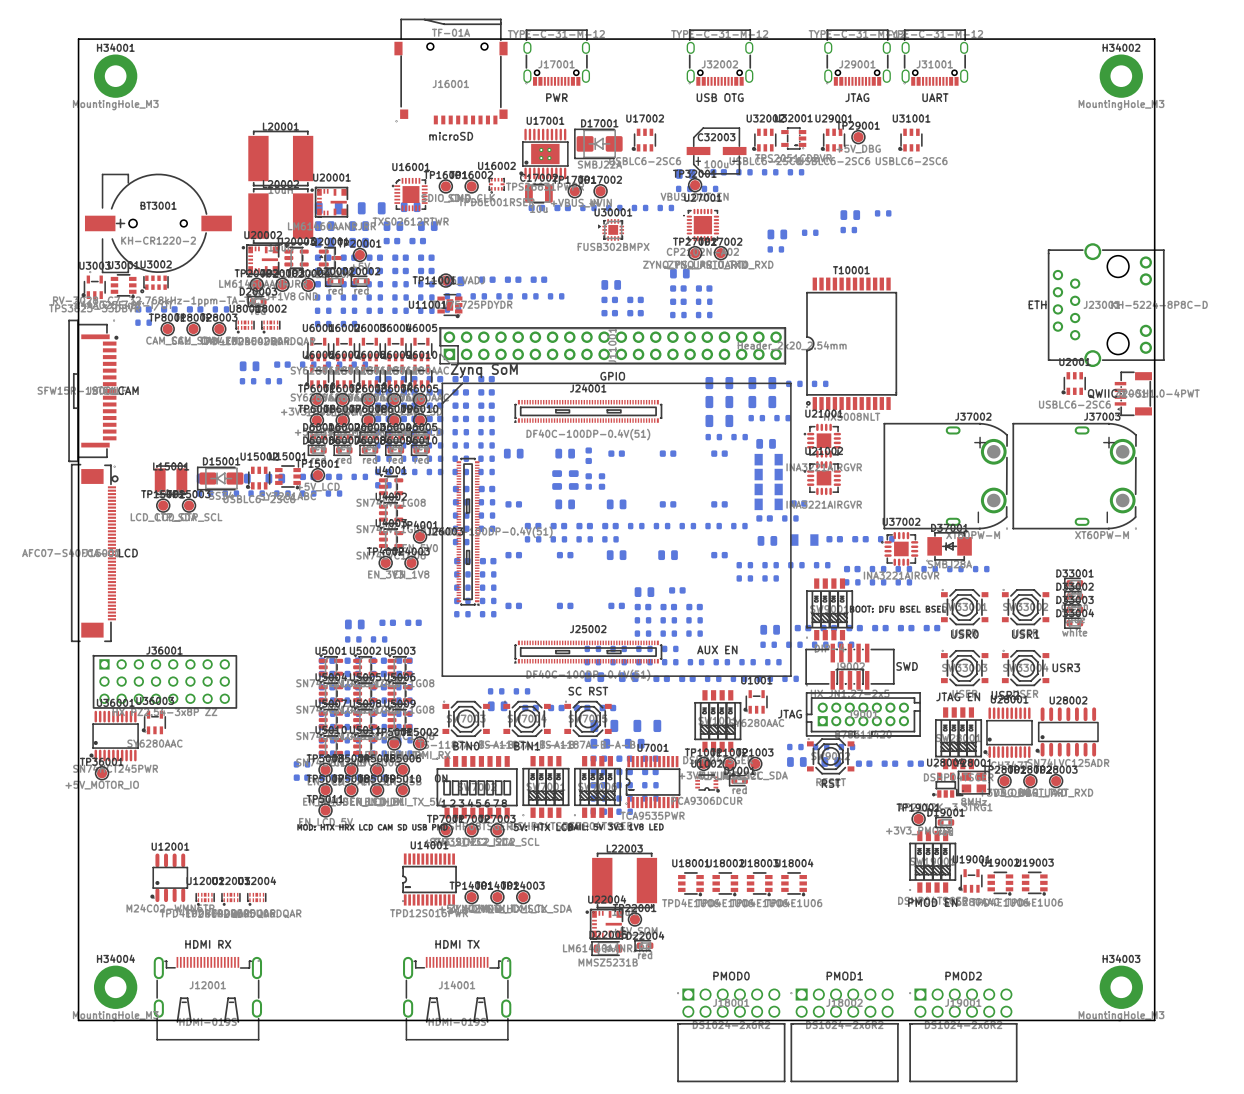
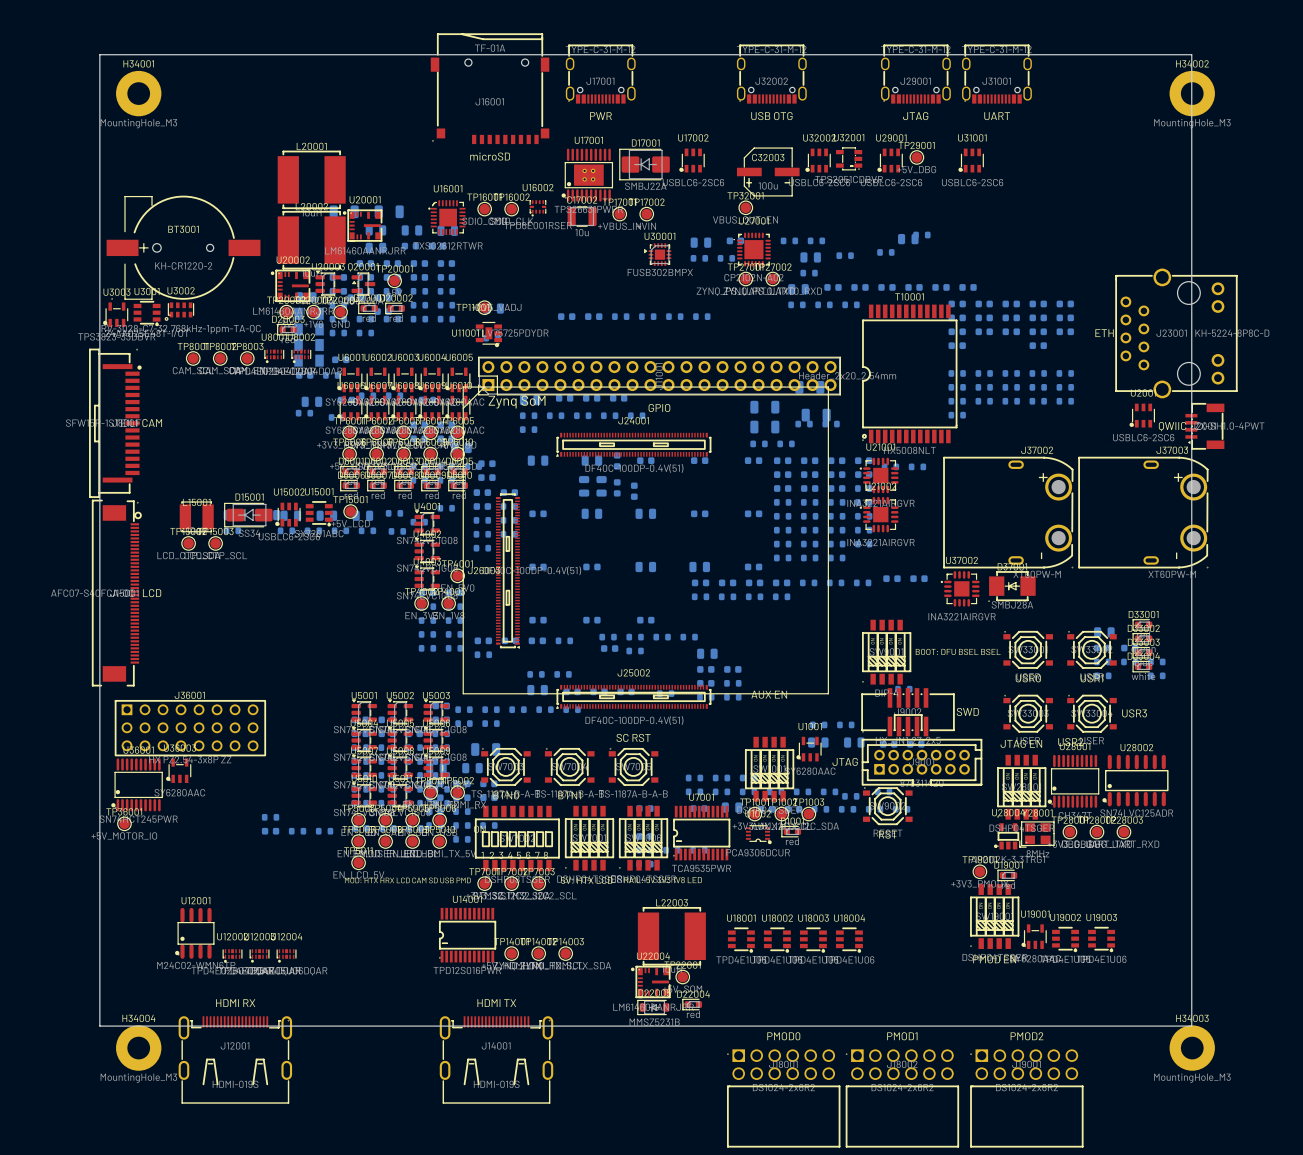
board edge: (1120, 39) (1154, 39) (1154, 1020) (78, 1020) (78, 966) -> (1191, 54) (1191, 1026) (99, 1026)
part: (718, 172) -> none
part: (744, 172) -> none
part: (770, 172) -> none
part: (795, 172) -> none
part: (685, 173) -> none
part: none -> (344, 211)
part: none -> (389, 211)
part: (684, 188) -> none
part: (710, 188) -> none
part footprint: [357, 202, 386, 215] -> [401, 225, 423, 236]
part: none -> (375, 230)
part: (536, 207) -> none
part: (562, 207) -> none
part: (588, 207) -> none
part: (614, 207) -> none
part: (640, 207) -> none
part: (665, 207) -> none
part: (328, 208) -> none
part: none -> (921, 235)
part: (883, 213) -> none
part: none -> (735, 240)
part: none -> (789, 240)
part: none -> (816, 240)
part: none -> (700, 242)
part: none -> (410, 246)
part: none -> (437, 246)
part: none -> (375, 247)
part: (324, 226) -> none
part: (359, 226) -> none
part: (393, 226) -> none
part: (427, 226) -> none
part: none -> (885, 252)
part: none -> (845, 255)
part: (848, 230) -> none
part: (810, 232) -> none
part: none -> (699, 258)
part: none -> (726, 258)
part position: (777, 234) -> (810, 257)
part: none -> (365, 263)
part: none -> (392, 263)
part: none -> (419, 263)
part: none -> (446, 263)
part: (391, 241) -> none
part: (417, 241) -> none
part: (324, 242) -> none
part: (359, 242) -> none
part: none -> (809, 273)
part: (775, 249) -> none
part: none -> (338, 277)
part: none -> (365, 277)
part: none -> (392, 277)
part: none -> (419, 277)
part: none -> (446, 277)
part: (323, 257) -> none
part: (348, 257) -> none
part: (374, 257) -> none
part: (400, 257) -> none
part: (426, 257) -> none
part: none -> (832, 287)
part: none -> (859, 287)
part: none -> (887, 287)
part: none -> (914, 287)
part: none -> (941, 287)
part: none -> (968, 287)
part: none -> (798, 289)
part: none -> (338, 291)
part: none -> (365, 291)
part: none -> (392, 291)
part: none -> (419, 291)
part: none -> (446, 291)
part: none -> (306, 297)
part: (374, 270) -> none
part: (400, 270) -> none
part: (426, 270) -> none
part: (679, 273) -> none
part: none -> (796, 304)
part: none -> (823, 304)
part: none -> (850, 304)
part: none -> (957, 303)
part: none -> (984, 303)
part: none -> (1011, 303)
part: none -> (1038, 303)
part: none -> (1065, 303)
part: none -> (338, 305)
part: none -> (419, 305)
part: none -> (446, 305)
part: (487, 279) -> none
part: (513, 279) -> none
part: (538, 279) -> none
part: (323, 284) -> none
part: (374, 284) -> none
part: (400, 284) -> none
part: (426, 284) -> none
part: (611, 284) -> none
part: none -> (309, 313)
part: (678, 288) -> none
part: (704, 288) -> none
part: none -> (566, 316)
part: none -> (593, 316)
part: none -> (647, 316)
part: none -> (674, 316)
part: none -> (701, 316)
part: none -> (957, 317)
part: none -> (984, 317)
part: none -> (1011, 317)
part: none -> (1038, 317)
part: none -> (1065, 317)
part: none -> (338, 319)
part: none -> (365, 319)
part: none -> (392, 319)
part: none -> (419, 319)
part: none -> (446, 319)
part: (452, 296) -> none
part: (478, 296) -> none
part: (504, 296) -> none
part: (530, 296) -> none
part position: (556, 296) -> (620, 316)
part: (323, 297) -> none
part: (348, 297) -> none
part: (374, 297) -> none
part: (400, 297) -> none
part: (426, 297) -> none
part: (609, 299) -> none
part: (635, 299) -> none
part: none -> (309, 329)
part: (678, 301) -> none
part: (704, 301) -> none
part: none -> (957, 331)
part: none -> (984, 331)
part: none -> (1011, 331)
part: none -> (1038, 331)
part: none -> (1065, 331)
part: none -> (338, 333)
part: none -> (365, 333)
part: (143, 309) -> none
part: (169, 309) -> none
part: (195, 309) -> none
part: (220, 309) -> none
part: (323, 310) -> none
part: (348, 310) -> none
part: (374, 310) -> none
part: (400, 310) -> none
part: (426, 310) -> none
part: (609, 313) -> none
part: (635, 313) -> none
part: (678, 315) -> none
part: (704, 315) -> none
part: none -> (309, 345)
part: none -> (957, 345)
part: none -> (1038, 345)
part: (143, 322) -> none
part: (323, 324) -> none
part: (348, 324) -> none
part: none -> (340, 359)
part: none -> (309, 360)
part: none -> (957, 373)
part: none -> (984, 373)
part: none -> (1011, 373)
part: none -> (1038, 373)
part: none -> (1065, 373)
part: none -> (304, 375)
part: none -> (331, 375)
part: none -> (809, 387)
part: none -> (957, 387)
part: none -> (984, 387)
part: none -> (1011, 387)
part: none -> (1038, 387)
part: none -> (1065, 387)
part footprint: [274, 361, 291, 368] -> [301, 396, 323, 407]
part: (308, 364) -> none
part: (249, 366) -> none
part: none -> (564, 398)
part: none -> (591, 398)
part: none -> (618, 398)
part: none -> (346, 400)
part: none -> (427, 400)
part: none -> (530, 400)
part: none -> (957, 401)
part: none -> (984, 401)
part: none -> (1011, 401)
part: none -> (1038, 401)
part: none -> (1065, 401)
part: none -> (764, 407)
part: (383, 379) -> none
part: (409, 379) -> none
part: (434, 379) -> none
part: (460, 379) -> none
part: (486, 379) -> none
part: (248, 381) -> none
line: (442, 383) (790, 383) (790, 676) (442, 676) (442, 383) -> (463, 387) (828, 387) (828, 693) (463, 693) (463, 387)
line: (462, 383) (442, 403) -> (484, 387) (463, 408)
part: none -> (528, 415)
part: none -> (555, 415)
part: none -> (582, 415)
part: none -> (609, 415)
part: none -> (636, 415)
part: (719, 383) -> none
part: (794, 383) -> none
part: (820, 383) -> none
part: none -> (957, 415)
part: none -> (337, 417)
part: none -> (804, 424)
part: none -> (831, 424)
part: (434, 392) -> none
part: (460, 392) -> none
part: (486, 392) -> none
part: none -> (764, 427)
part: none -> (528, 429)
part: (719, 402) -> none
part: (762, 402) -> none
part: (434, 405) -> none
part: (460, 405) -> none
part: (486, 405) -> none
part: none -> (759, 443)
part: none -> (786, 443)
part: none -> (461, 448)
part: (383, 418) -> none
part: (409, 418) -> none
part: (434, 418) -> none
part: (460, 418) -> none
part: (486, 418) -> none
part: (756, 418) -> none
part: (782, 418) -> none
part: (719, 420) -> none
part: none -> (538, 460)
part: none -> (591, 460)
part: none -> (617, 460)
part: none -> (645, 460)
part: none -> (699, 460)
part: none -> (753, 460)
part: none -> (782, 460)
part: none -> (809, 460)
part: none -> (836, 460)
part: none -> (863, 460)
part: none -> (486, 463)
part: (460, 432) -> none
part: (486, 432) -> none
part: none -> (890, 466)
part: none -> (917, 466)
part: (713, 437) -> none
part: (739, 437) -> none
part: none -> (782, 474)
part: none -> (809, 474)
part: none -> (836, 474)
part: none -> (863, 474)
part: none -> (486, 477)
part: (766, 443) -> none
part: (434, 445) -> none
part: (460, 445) -> none
part: (486, 445) -> none
part: none -> (584, 486)
part: none -> (617, 487)
part: (513, 453) -> none
part rotation: 0° (565, 453) -> 90° clockwise (601, 486)
part: (616, 453) -> none
part: (668, 453) -> none
part: (719, 453) -> none
part: none -> (782, 488)
part: none -> (809, 488)
part: none -> (836, 488)
part: none -> (863, 488)
part: none -> (482, 492)
part: none -> (509, 492)
part: (383, 458) -> none
part: (409, 458) -> none
part: (434, 458) -> none
part: (460, 458) -> none
part: (486, 458) -> none
part: (768, 459) -> none
part: none -> (782, 502)
part: none -> (809, 502)
part: none -> (836, 502)
part: none -> (863, 502)
part: none -> (482, 506)
part: none -> (509, 506)
part: (383, 472) -> none
part: (434, 472) -> none
part: (460, 472) -> none
part: (486, 472) -> none
part footprint: [325, 473, 343, 481] -> [352, 510, 374, 521]
part footprint: [598, 473, 606, 490] -> [635, 508, 657, 519]
part: (768, 474) -> none
part: (308, 476) -> none
part: none -> (699, 513)
part: none -> (753, 513)
part: (275, 478) -> none
part: none -> (290, 515)
part: none -> (326, 515)
part: none -> (782, 516)
part: none -> (809, 516)
part: none -> (836, 516)
part: none -> (863, 516)
part rotation: 0° (557, 480) -> 90° clockwise (591, 513)
part: (573, 480) -> none
part: (588, 481) -> none
part: none -> (482, 520)
part: none -> (509, 520)
part: (461, 489) -> none
part position: (486, 489) -> (538, 513)
part: (768, 489) -> none
part: none -> (782, 530)
part: none -> (809, 530)
part: none -> (836, 530)
part: none -> (863, 530)
part: (230, 493) -> none
part: none -> (397, 531)
part: none -> (482, 534)
part: none -> (509, 534)
part: (461, 502) -> none
part: (486, 502) -> none
part: (798, 503) -> none
part: (513, 504) -> none
part: (565, 504) -> none
part: (616, 504) -> none
part: (668, 504) -> none
part: (719, 504) -> none
part: (768, 504) -> none
part: none -> (782, 544)
part: none -> (809, 544)
part: none -> (836, 544)
part: none -> (863, 544)
part: none -> (482, 548)
part: (461, 515) -> none
part: (486, 515) -> none
part: (764, 518) -> none
part: (790, 518) -> none
part: none -> (782, 557)
part: none -> (809, 557)
part: none -> (836, 557)
part: (533, 526) -> none
part: (558, 526) -> none
part: (584, 526) -> none
part: (610, 526) -> none
part: (636, 526) -> none
part: (662, 526) -> none
part: (687, 526) -> none
part: (713, 526) -> none
part: (739, 526) -> none
part: (461, 528) -> none
part: (486, 528) -> none
part: none -> (538, 566)
part: none -> (591, 566)
part: none -> (645, 566)
part: none -> (699, 566)
part: none -> (753, 566)
part footprint: [790, 534, 819, 546] -> [853, 579, 872, 587]
part: (533, 539) -> none
part: (558, 539) -> none
part: (584, 539) -> none
part: (610, 539) -> none
part: (886, 539) -> none
part: (767, 540) -> none
part: (461, 542) -> none
part: none -> (700, 582)
part: none -> (727, 582)
part: none -> (754, 582)
part: none -> (781, 582)
part: none -> (808, 582)
part: none -> (835, 582)
part: none -> (427, 592)
part: none -> (454, 592)
part: (513, 555) -> none
part: (565, 555) -> none
part: (616, 555) -> none
part: (668, 555) -> none
part: (719, 555) -> none
part: none -> (700, 596)
part: none -> (727, 596)
part: none -> (754, 596)
part: none -> (781, 596)
part: (462, 561) -> none
part: (488, 561) -> none
part: none -> (427, 606)
part: none -> (454, 606)
part: (744, 565) -> none
part: (770, 565) -> none
part: (796, 565) -> none
part: (822, 565) -> none
part: (852, 569) -> none
part: (878, 569) -> none
part: (903, 569) -> none
part: (929, 569) -> none
part: (955, 569) -> none
part: (981, 569) -> none
part: (462, 574) -> none
part: (488, 574) -> none
part: none -> (538, 620)
part: none -> (591, 620)
part: none -> (645, 620)
part: (744, 578) -> none
part: (770, 578) -> none
part: none -> (427, 620)
part: none -> (454, 620)
part: (852, 582) -> none
part: (878, 582) -> none
part: (903, 582) -> none
part: (462, 587) -> none
part: (488, 587) -> none
part footprint: [634, 587, 655, 598] -> [680, 633, 698, 641]
part: (677, 590) -> none
part: none -> (1104, 632)
part: none -> (427, 634)
part: none -> (454, 634)
part: none -> (608, 637)
part: none -> (635, 637)
part: none -> (662, 637)
part: none -> (483, 640)
part: none -> (510, 640)
part: none -> (537, 640)
part: none -> (564, 640)
part: (462, 600) -> none
part: (488, 600) -> none
part: none -> (427, 648)
part: none -> (454, 648)
part: (513, 605) -> none
part: (616, 605) -> none
part: none -> (1102, 648)
part: none -> (1129, 648)
part: (642, 607) -> none
part: (668, 607) -> none
part: (694, 607) -> none
part: none -> (635, 651)
part: none -> (707, 653)
part: none -> (483, 654)
part: (462, 614) -> none
part: (488, 614) -> none
part: none -> (1102, 661)
part: none -> (1129, 661)
part: none -> (1156, 661)
part: (642, 620) -> none
part: (668, 620) -> none
part: (694, 620) -> none
part: (387, 622) -> none
part: (413, 622) -> none
part: (354, 624) -> none
part: none -> (705, 669)
part: none -> (732, 669)
part: (803, 628) -> none
part: (828, 628) -> none
part: (854, 628) -> none
part: (880, 628) -> none
part: (906, 628) -> none
part: (931, 628) -> none
part: (770, 629) -> none
part: none -> (536, 674)
part: none -> (563, 674)
part: none -> (1102, 675)
part: none -> (1156, 675)
part: (642, 633) -> none
part: (668, 633) -> none
part: (694, 633) -> none
part: (353, 639) -> none
part: (379, 639) -> none
part: none -> (705, 683)
part: none -> (732, 683)
part: (768, 644) -> none
part: (794, 644) -> none
part: (820, 644) -> none
part: none -> (537, 690)
part: none -> (572, 691)
part: none -> (599, 691)
part: none -> (626, 691)
part: (592, 648) -> none
part: (644, 648) -> none
part: (670, 648) -> none
part: none -> (705, 697)
part: none -> (732, 697)
part: (327, 660) -> none
part: (352, 660) -> none
part: (378, 660) -> none
part: (592, 662) -> none
part: (618, 662) -> none
part: (644, 662) -> none
part: (670, 662) -> none
part: (696, 662) -> none
part: (721, 662) -> none
part: (747, 662) -> none
part: (773, 662) -> none
part: none -> (463, 709)
part: none -> (490, 709)
part: none -> (518, 709)
part: none -> (545, 709)
part: none -> (572, 709)
part: (378, 673) -> none
part: none -> (463, 723)
part: none -> (490, 723)
part: (594, 677) -> none
part: (628, 677) -> none
part: (661, 678) -> none
part: (687, 678) -> none
part: (713, 678) -> none
part: (738, 678) -> none
part: (496, 691) -> none
part: (521, 691) -> none
part: none -> (818, 742)
part: none -> (854, 742)
part: none -> (888, 744)
part: none -> (915, 744)
part: (497, 706) -> none
part: (530, 707) -> none
part: (556, 707) -> none
part: (582, 707) -> none
part: (607, 707) -> none
part footprint: [633, 719, 662, 733] -> [685, 774, 704, 782]
part: none -> (436, 768)
part: none -> (472, 768)
part position: (604, 725) -> (485, 749)
part: none -> (721, 777)
part: none -> (748, 777)
part: none -> (434, 783)
part: none -> (461, 783)
part: none -> (488, 783)
part: none -> (694, 791)
part: none -> (721, 791)
part: none -> (748, 791)
part: none -> (775, 791)
part: none -> (802, 791)
part: none -> (829, 791)
part: none -> (883, 791)
part: (600, 743) -> none
part: (634, 743) -> none
part: (821, 747) -> none
part: (846, 747) -> none
part: none -> (434, 797)
part: none -> (461, 797)
part: none -> (488, 797)
part: none -> (732, 807)
part footprint: [787, 757, 807, 767] -> [838, 805, 857, 813]
part: (624, 758) -> none
part: none -> (766, 809)
part: none -> (793, 809)
part: none -> (820, 809)
part: none -> (874, 809)
part: none -> (901, 809)
part: none -> (434, 811)
part: none -> (461, 811)
part: (831, 761) -> none
part: (864, 763) -> none
part: (889, 763) -> none
part: (915, 763) -> none
part position: (301, 764) -> (324, 831)
part: none -> (270, 817)
part: (598, 771) -> none
part: (624, 771) -> none
part: (650, 771) -> none
part: none -> (434, 825)
part: none -> (461, 825)
part: none -> (488, 825)
part: (301, 777) -> none
part: none -> (270, 831)
part: none -> (297, 831)
part: (624, 785) -> none
part: (650, 785) -> none
part: none -> (461, 839)
part: (624, 811) -> none

